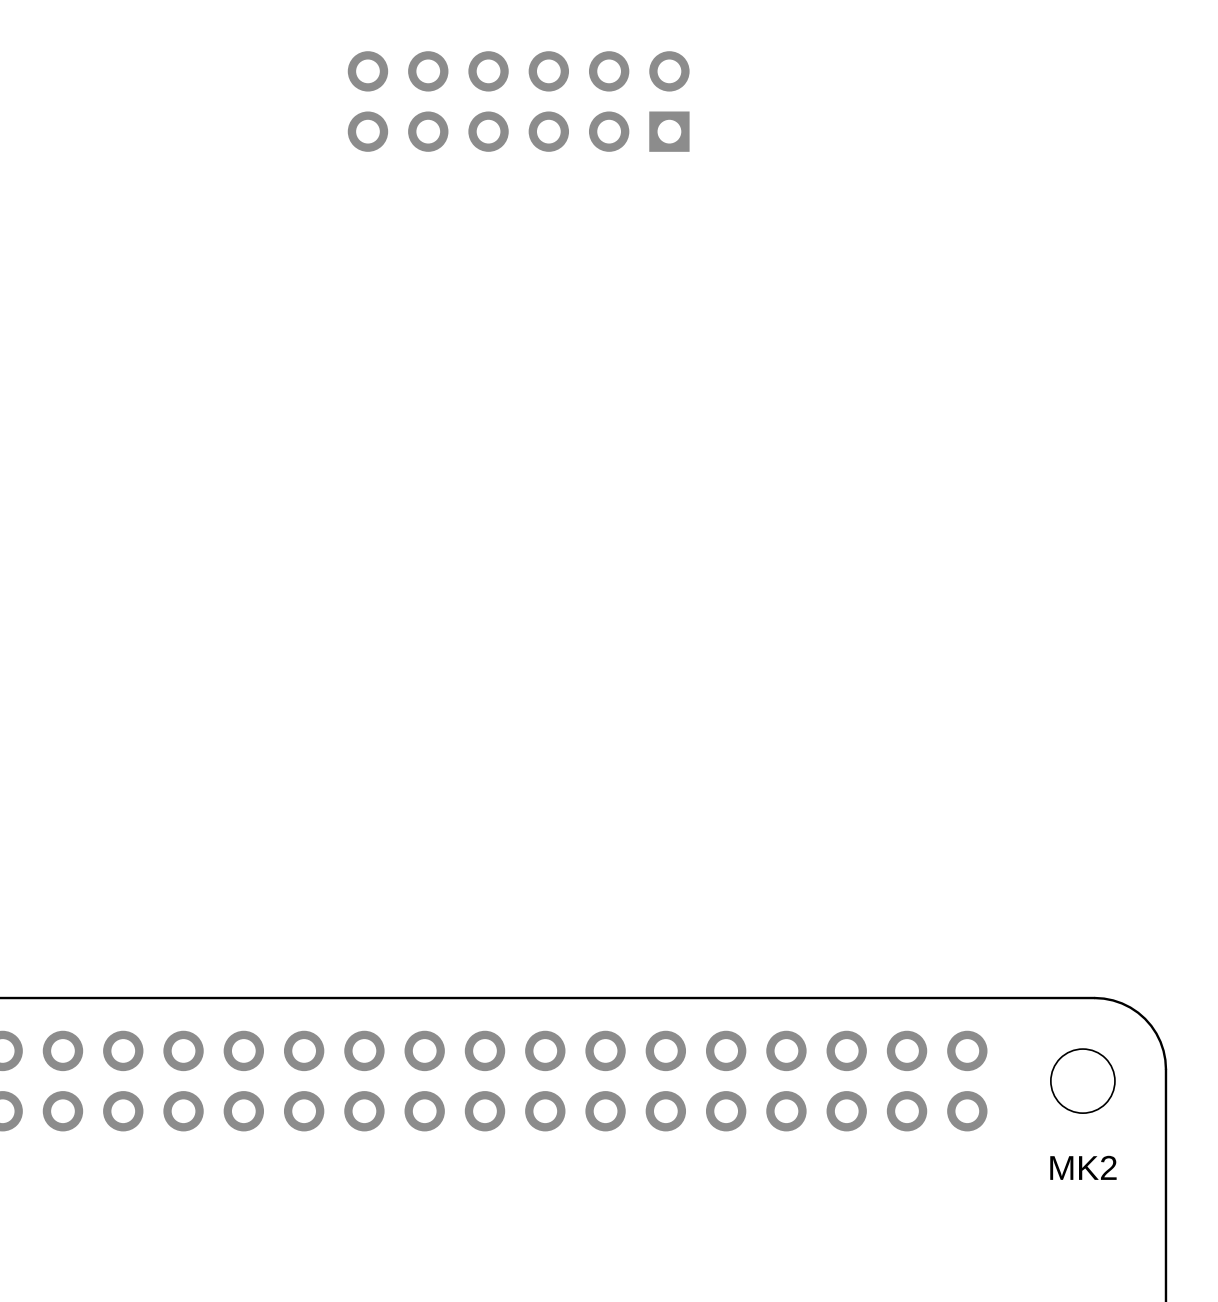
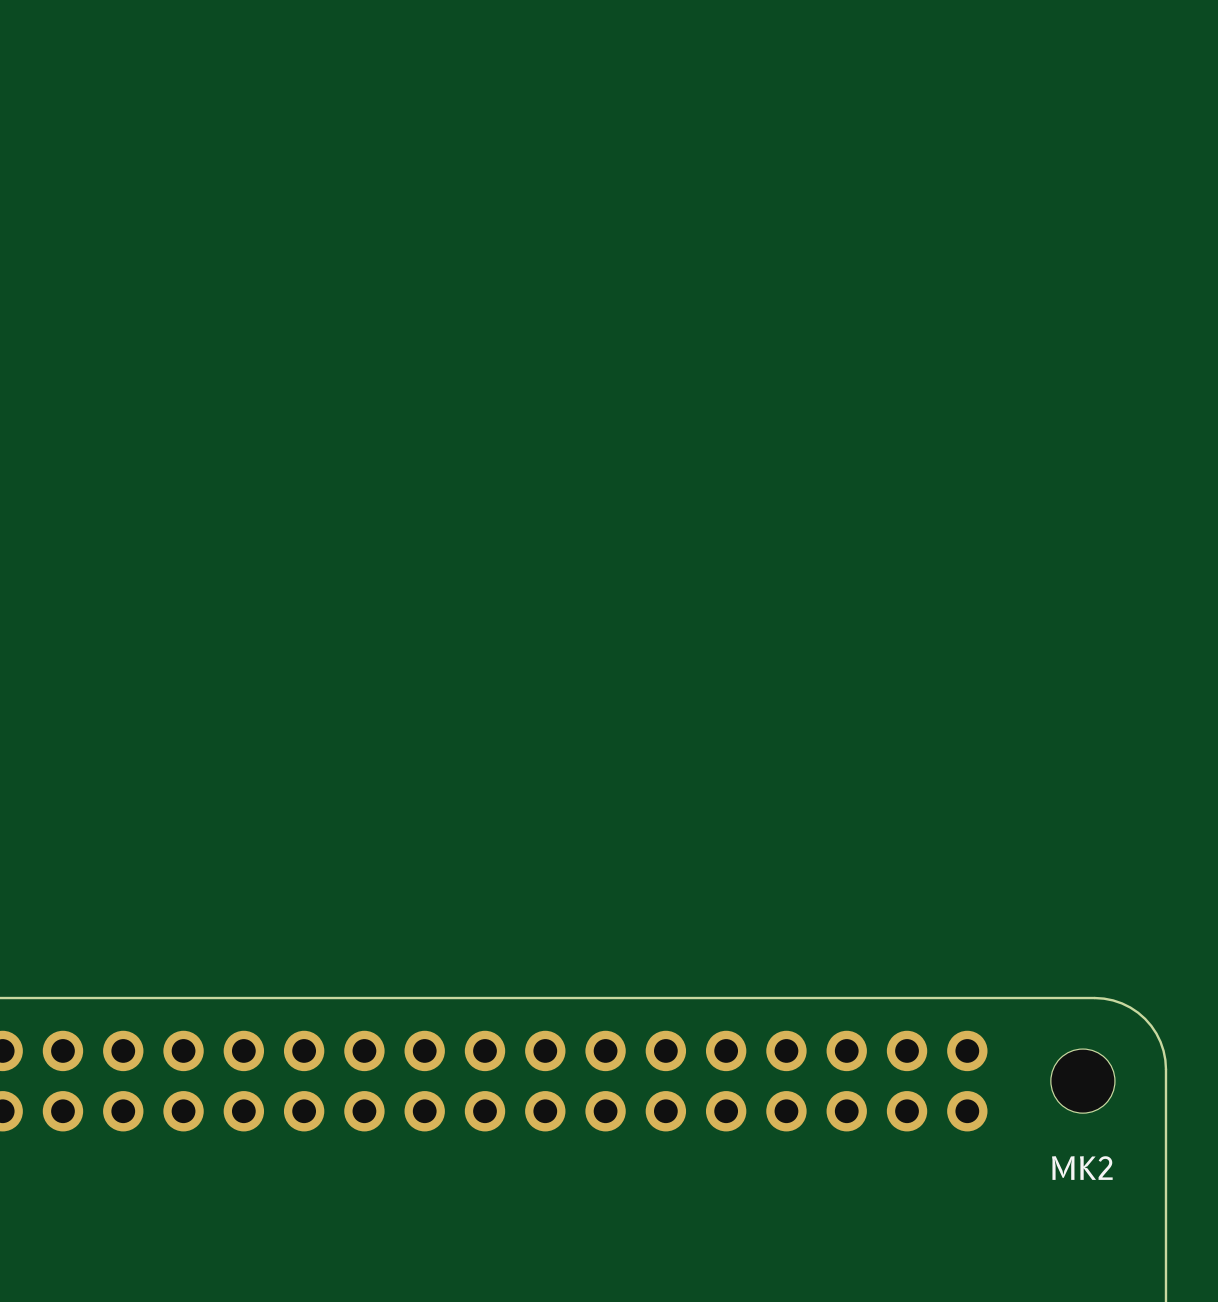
part: (518, 101) -> none

